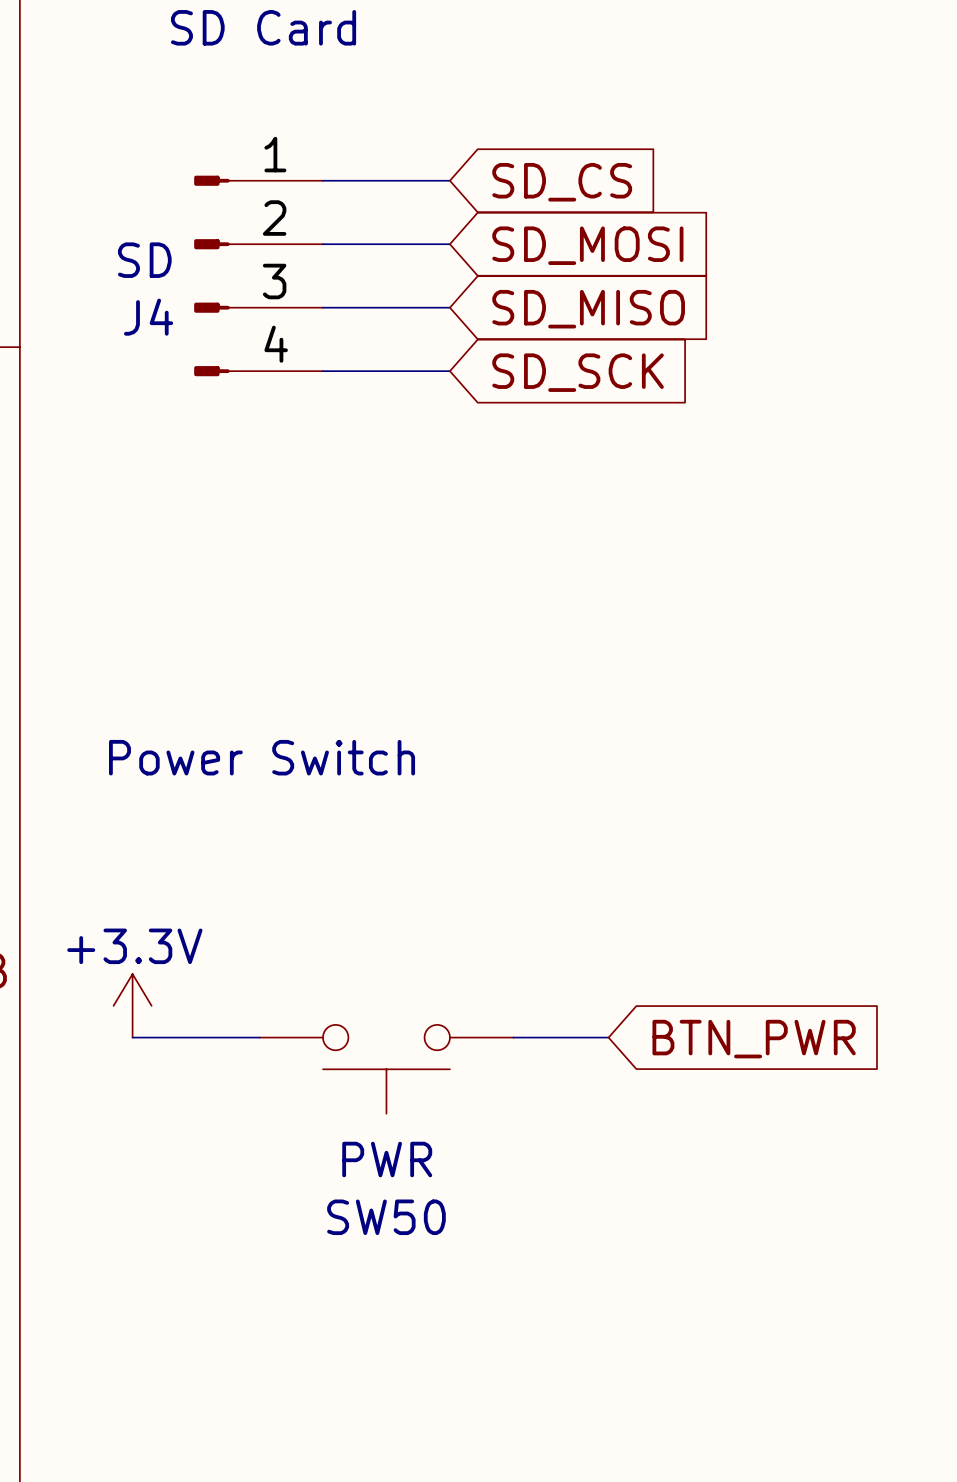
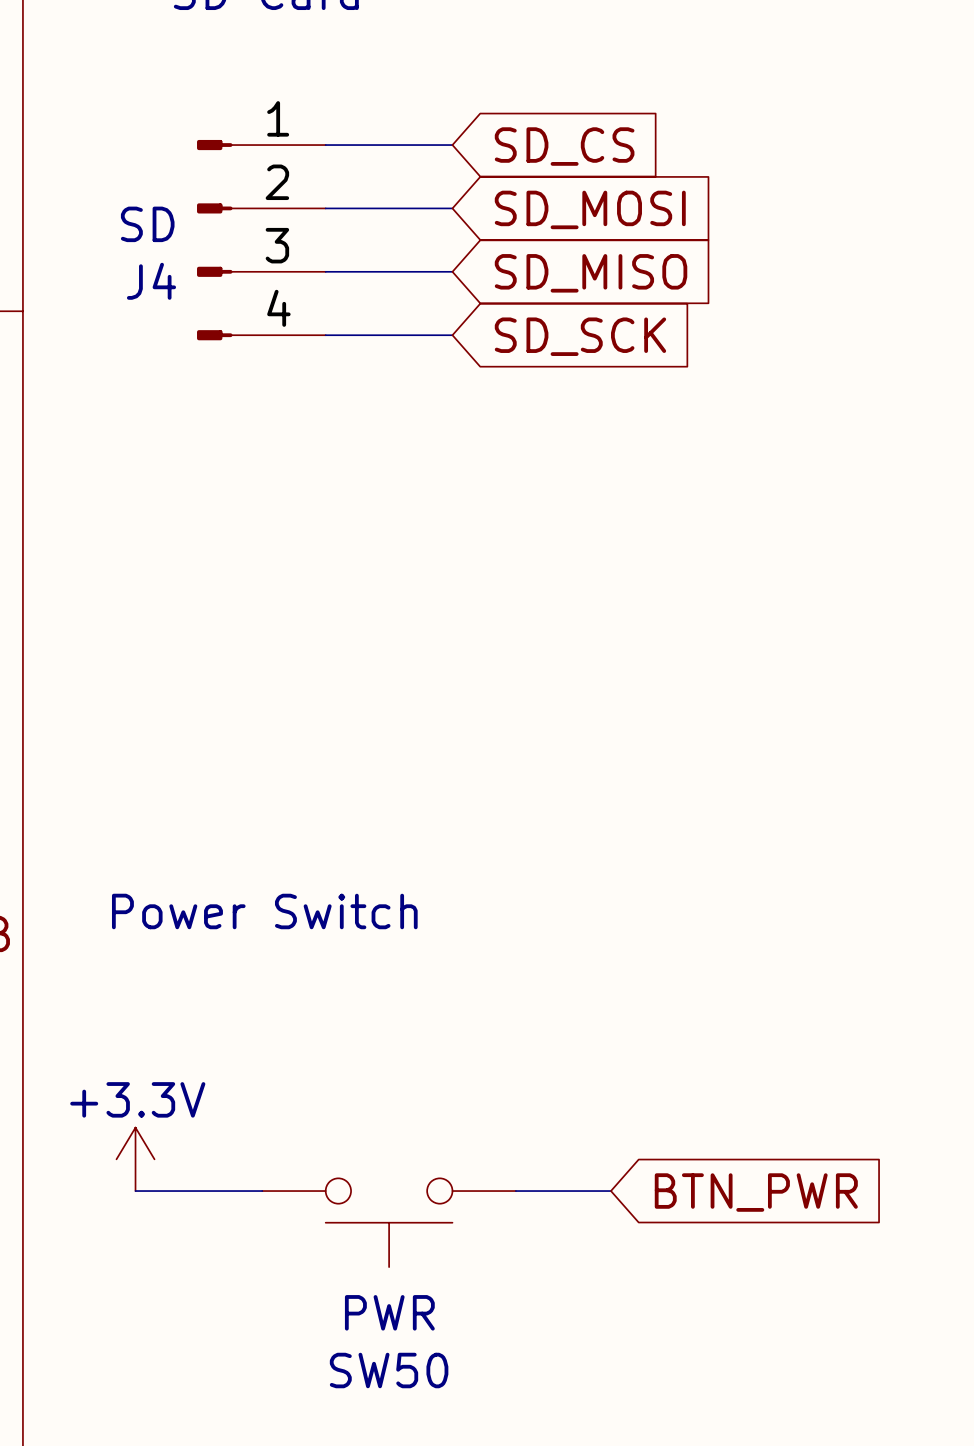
text position: Power Switch (262, 757) -> Power Switch (264, 911)
power symbol position: +3.3V (132, 1005) -> +3.3V (135, 1159)
wire: (132, 1037) (259, 1037) -> (135, 1191) (262, 1191)
wire: (513, 1037) (608, 1037) -> (515, 1191) (610, 1191)
global label position: BTN_PWR (754, 1039) -> BTN_PWR (756, 1192)
SW50 position: (386, 1069) -> (389, 1222)

